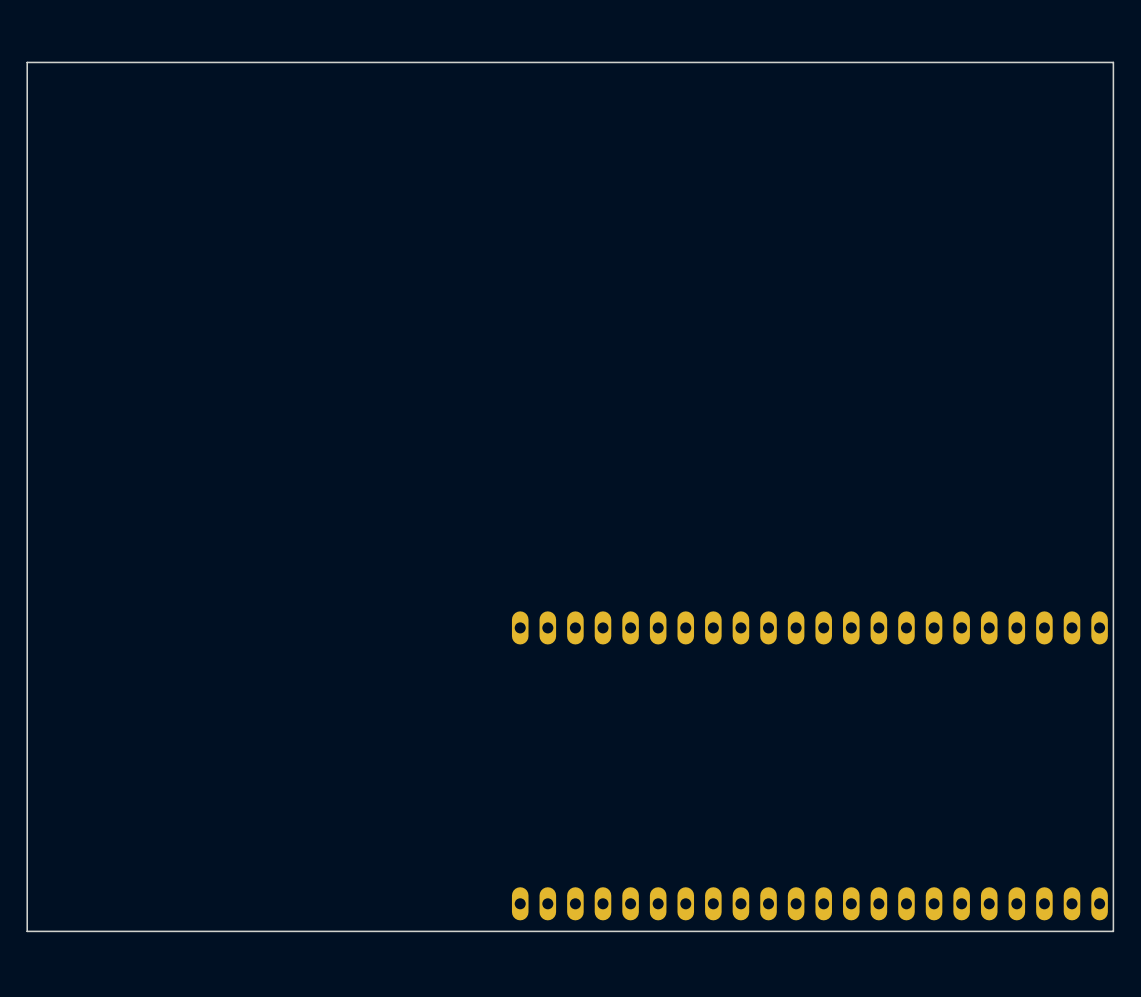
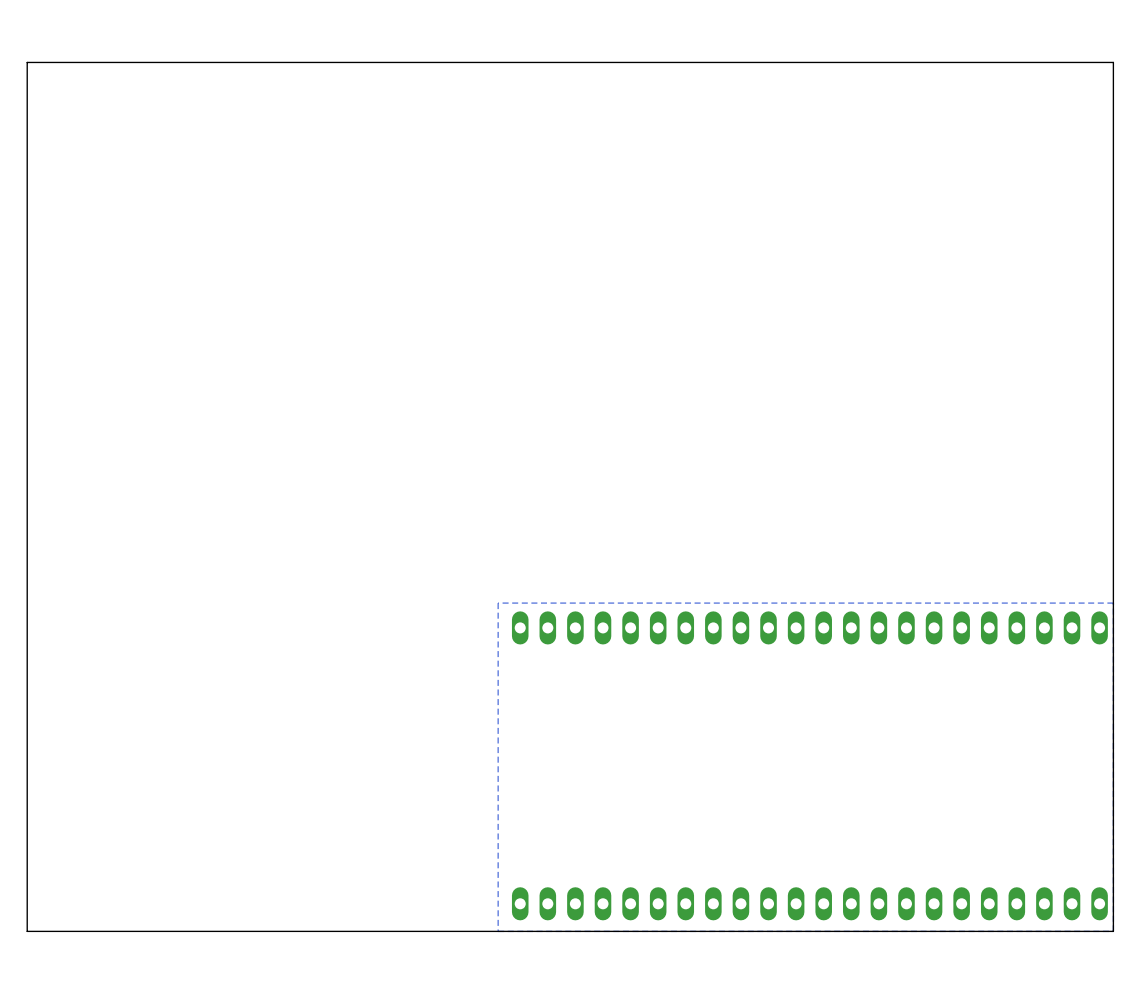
zone outline: none -> (1113, 603) (498, 603) (498, 931) (1113, 931) (1113, 603)

